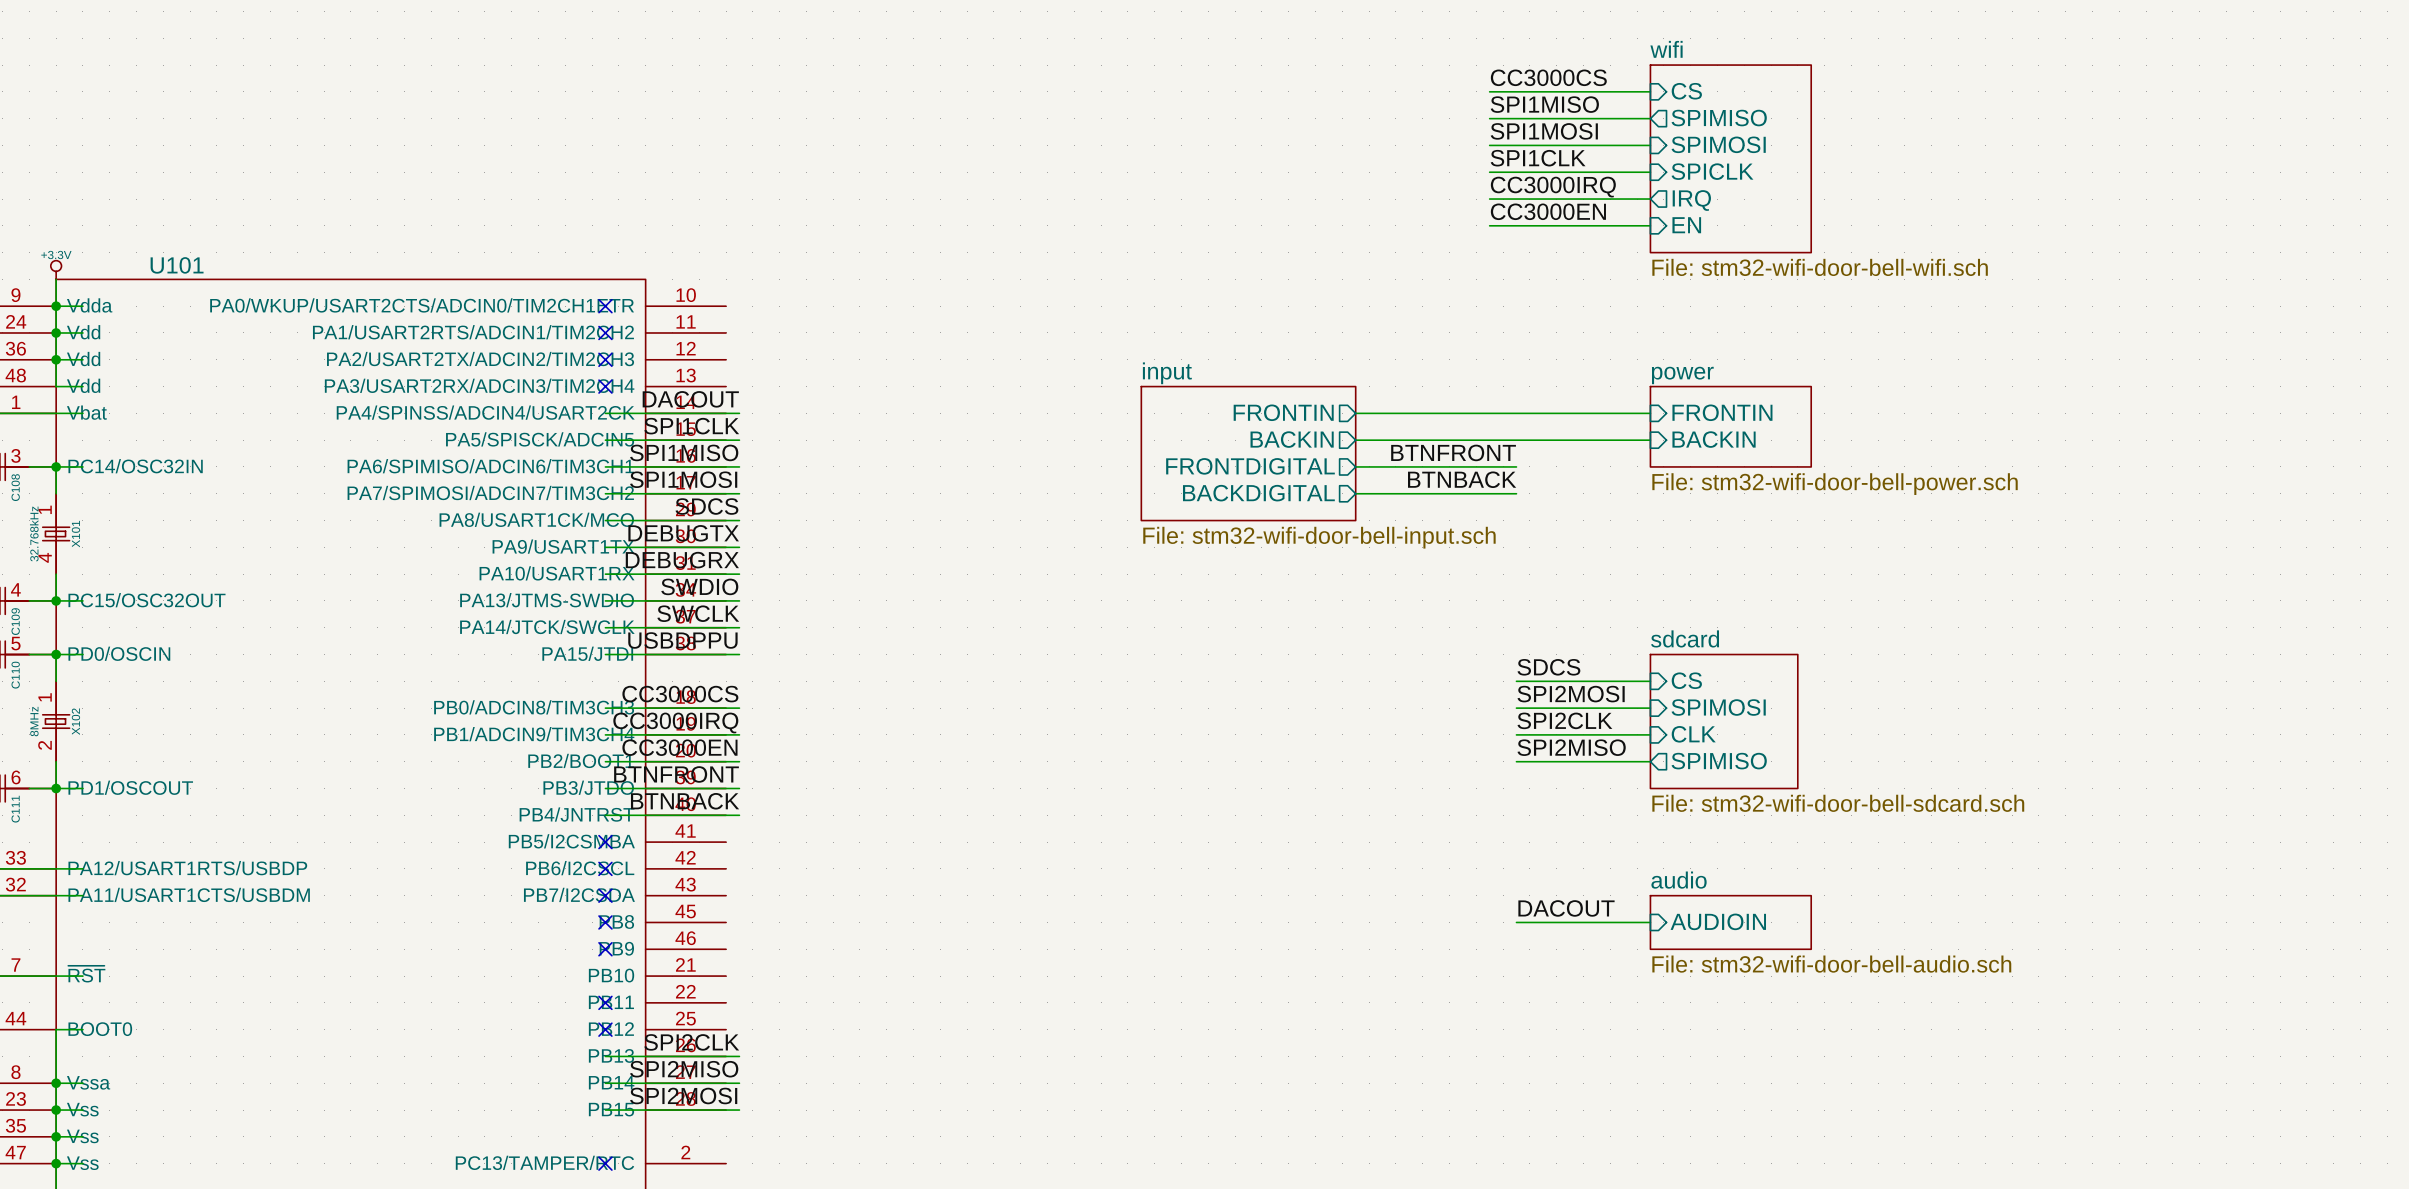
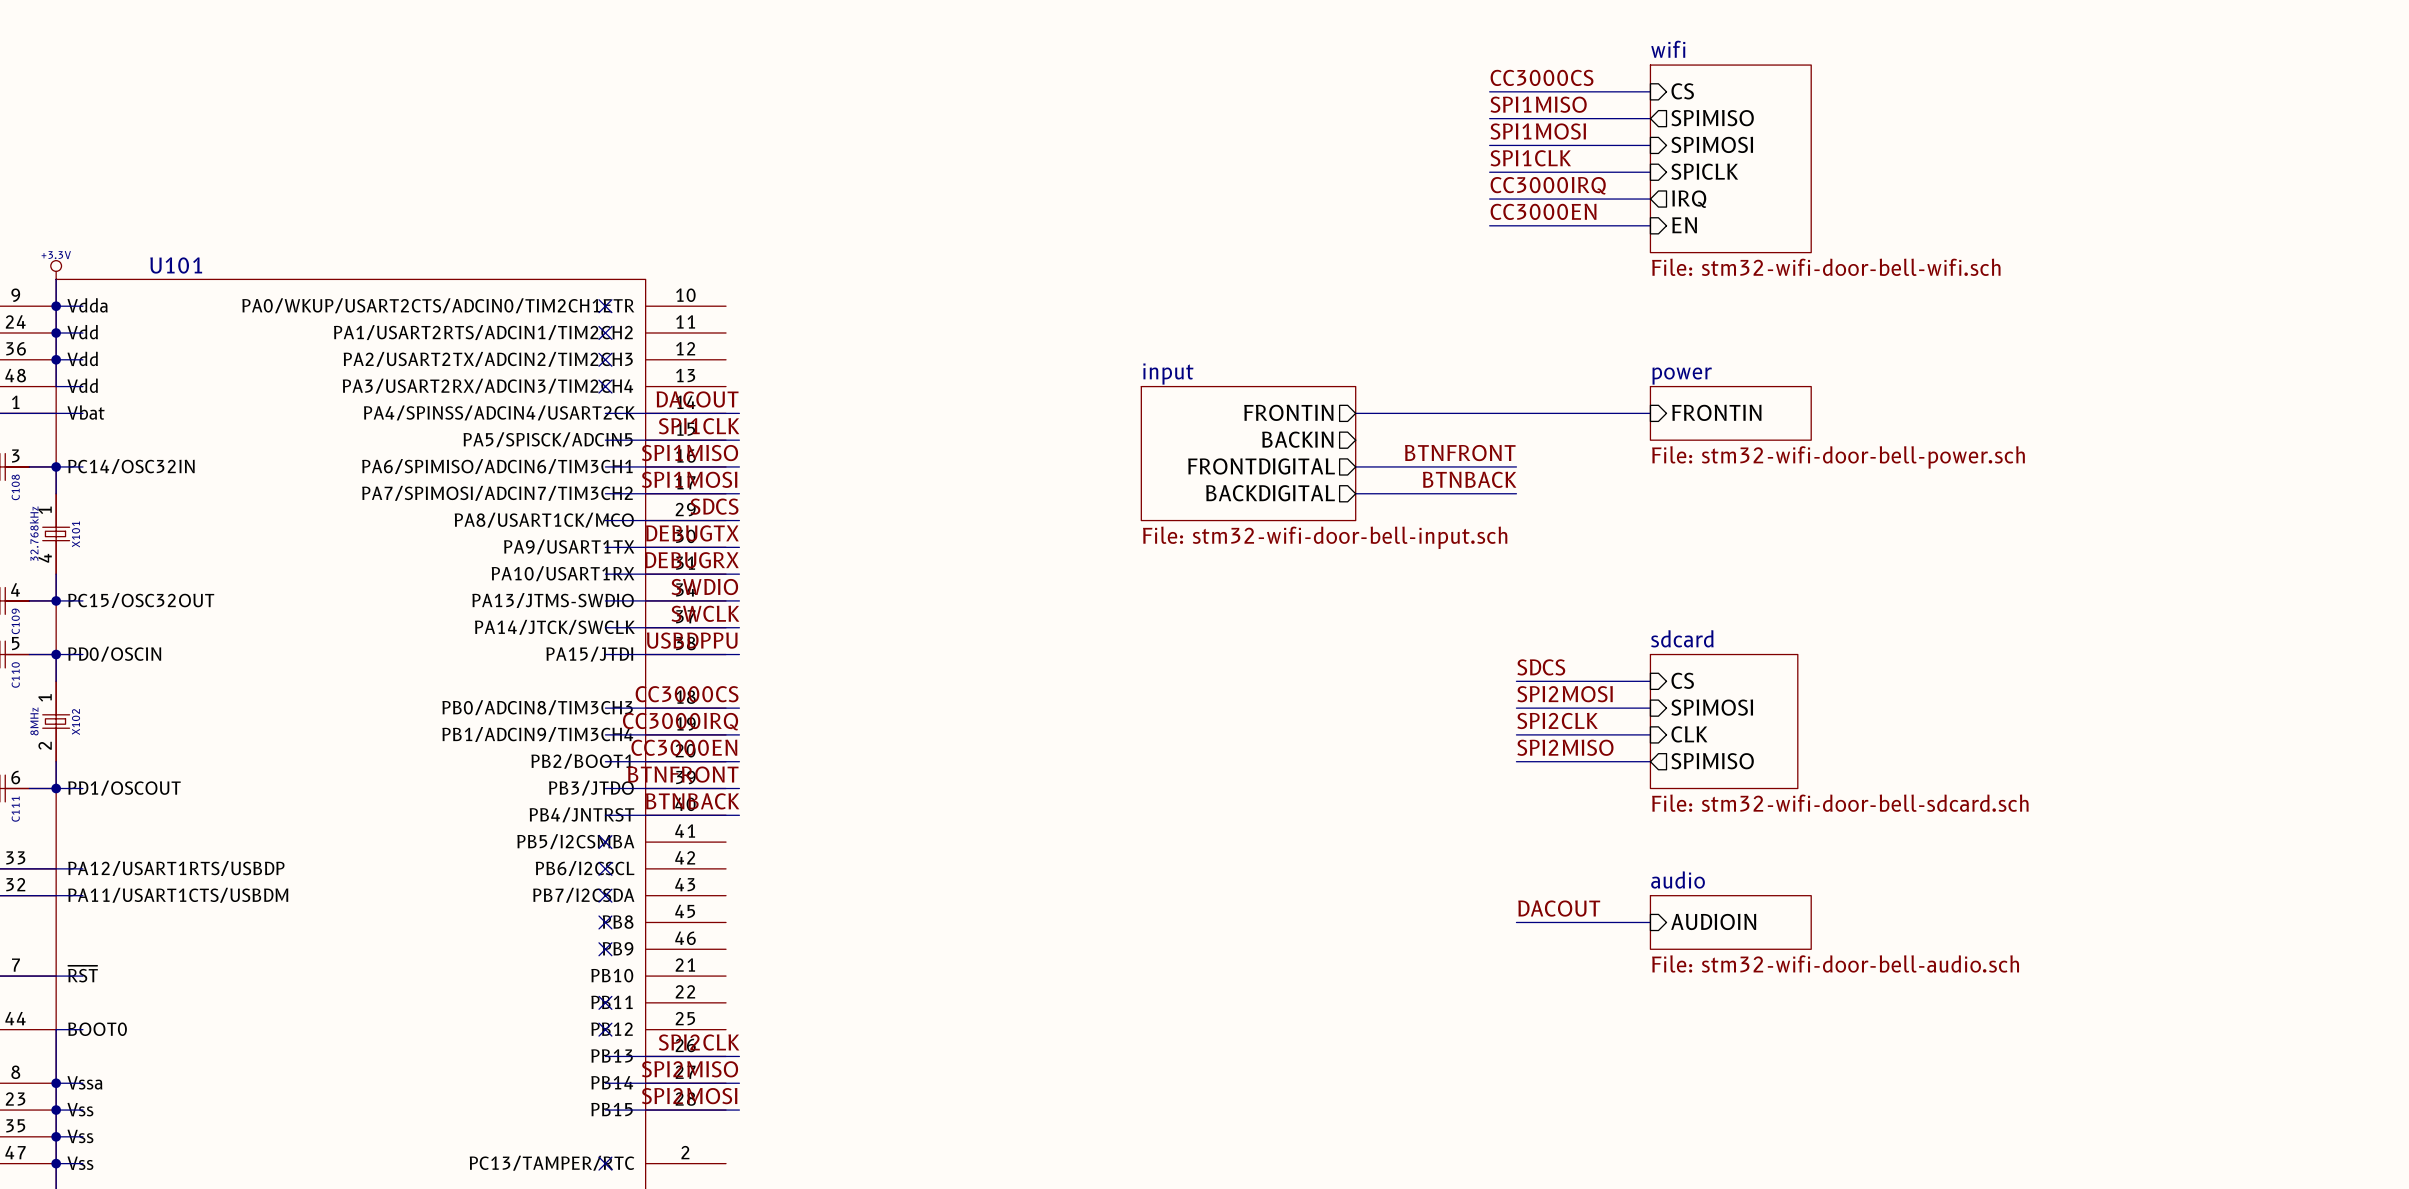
sheet power: none -> File: stm32-wifi-door-bell-power.sch (1730, 413)
sheet power: File: stm32-wifi-door-bell-power.sch (1730, 426) -> none
sheet pin: BACKIN (1714, 439) -> none
wire: (1355, 440) (1650, 440) -> none

